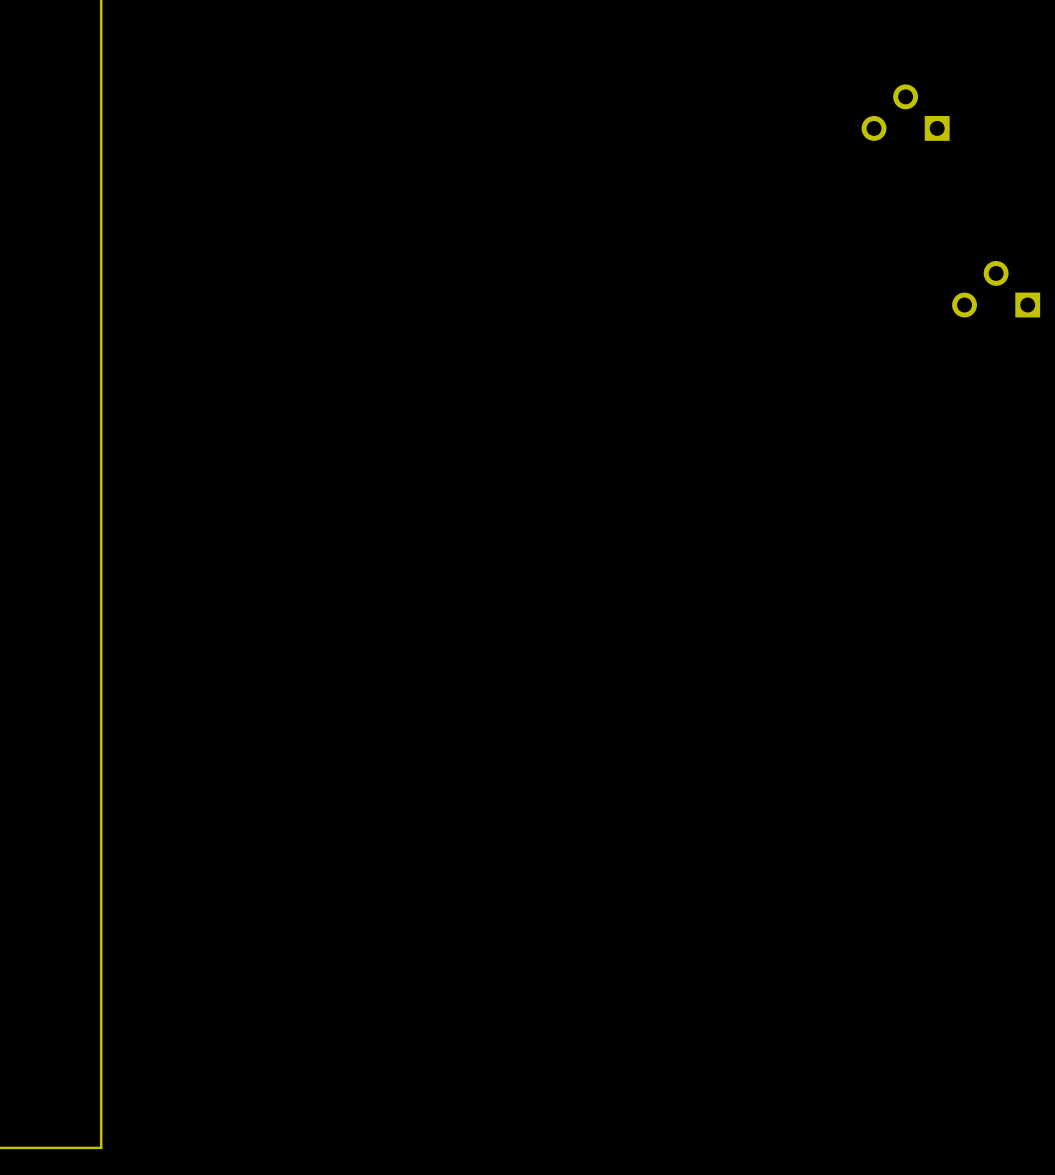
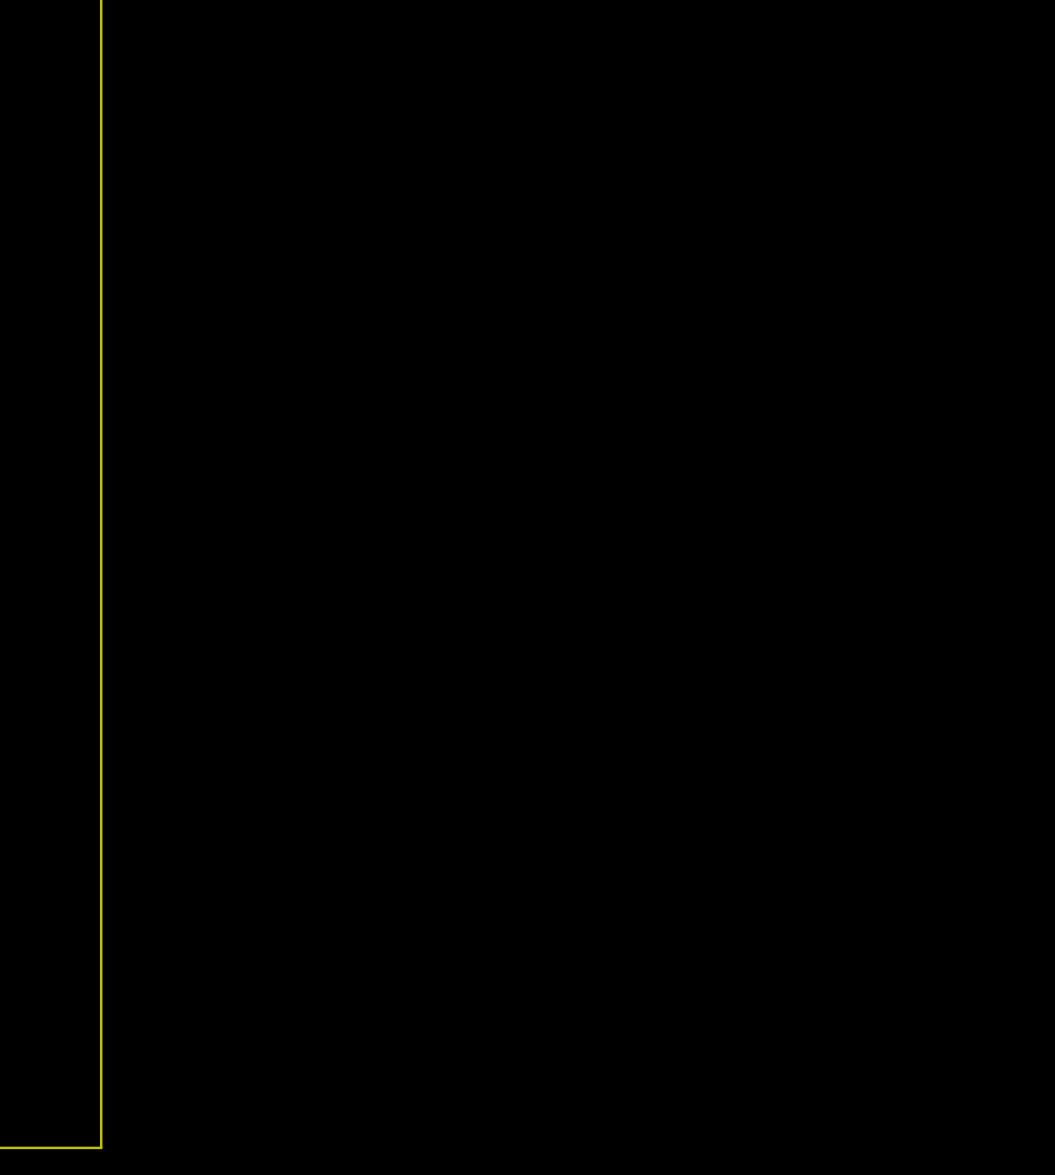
part: (905, 112) -> none
part: (996, 289) -> none

